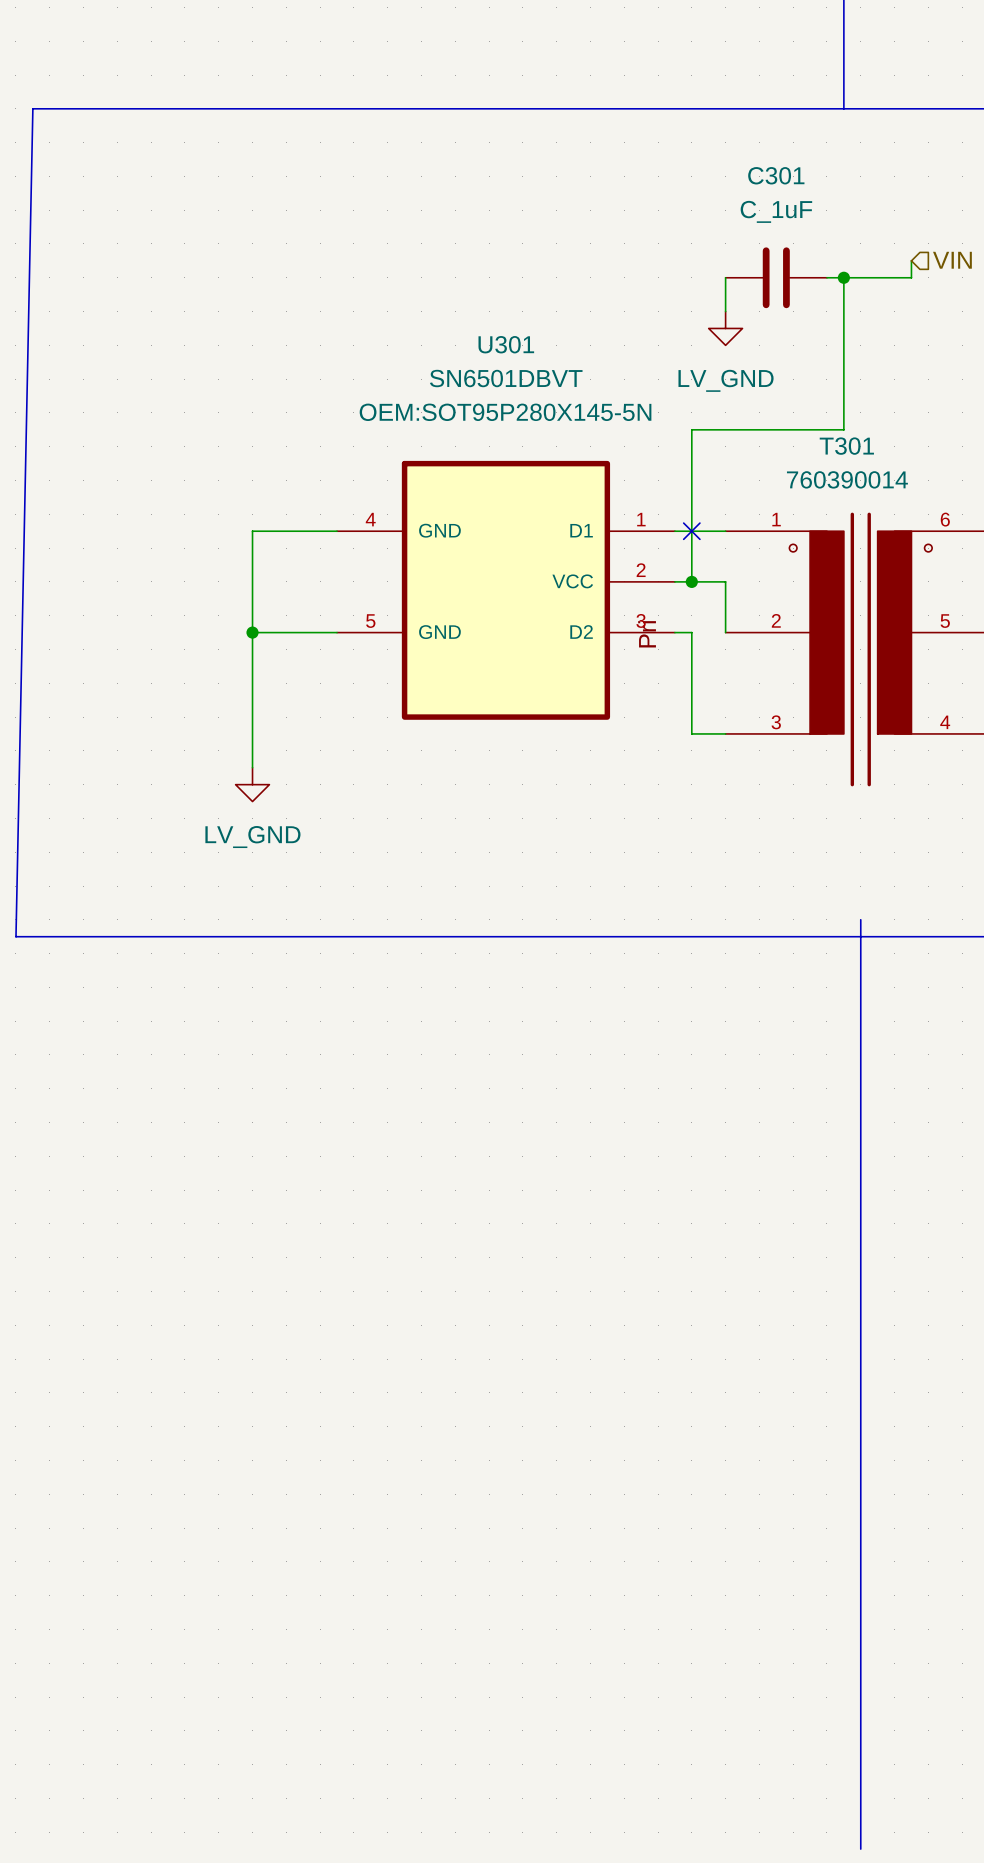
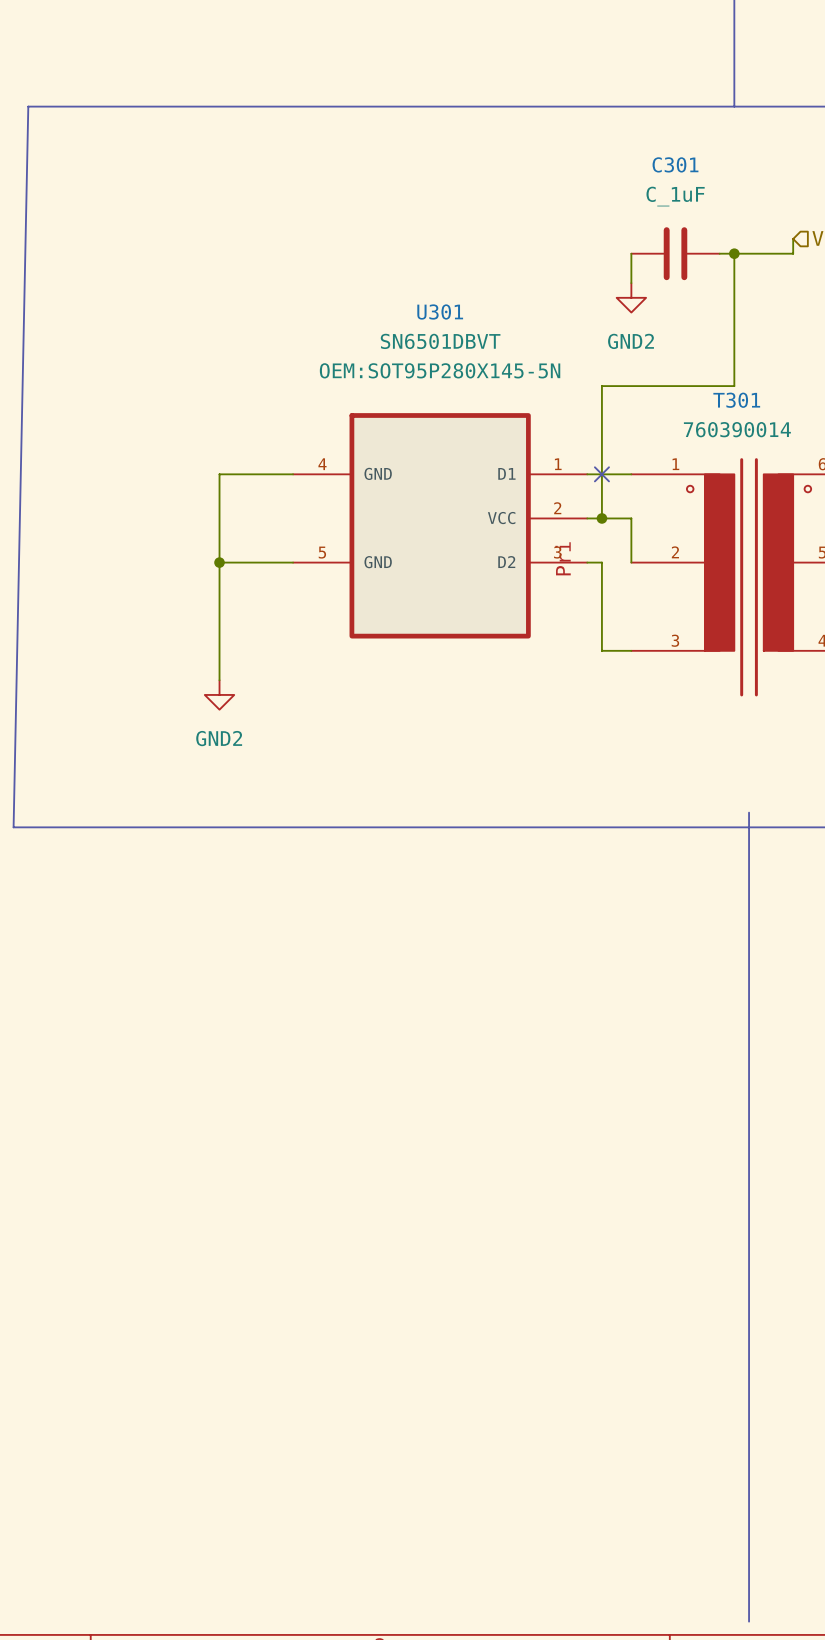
power symbol: LV_GND (725, 328) -> GND2 (631, 297)
power symbol: LV_GND (252, 784) -> GND2 (219, 694)

